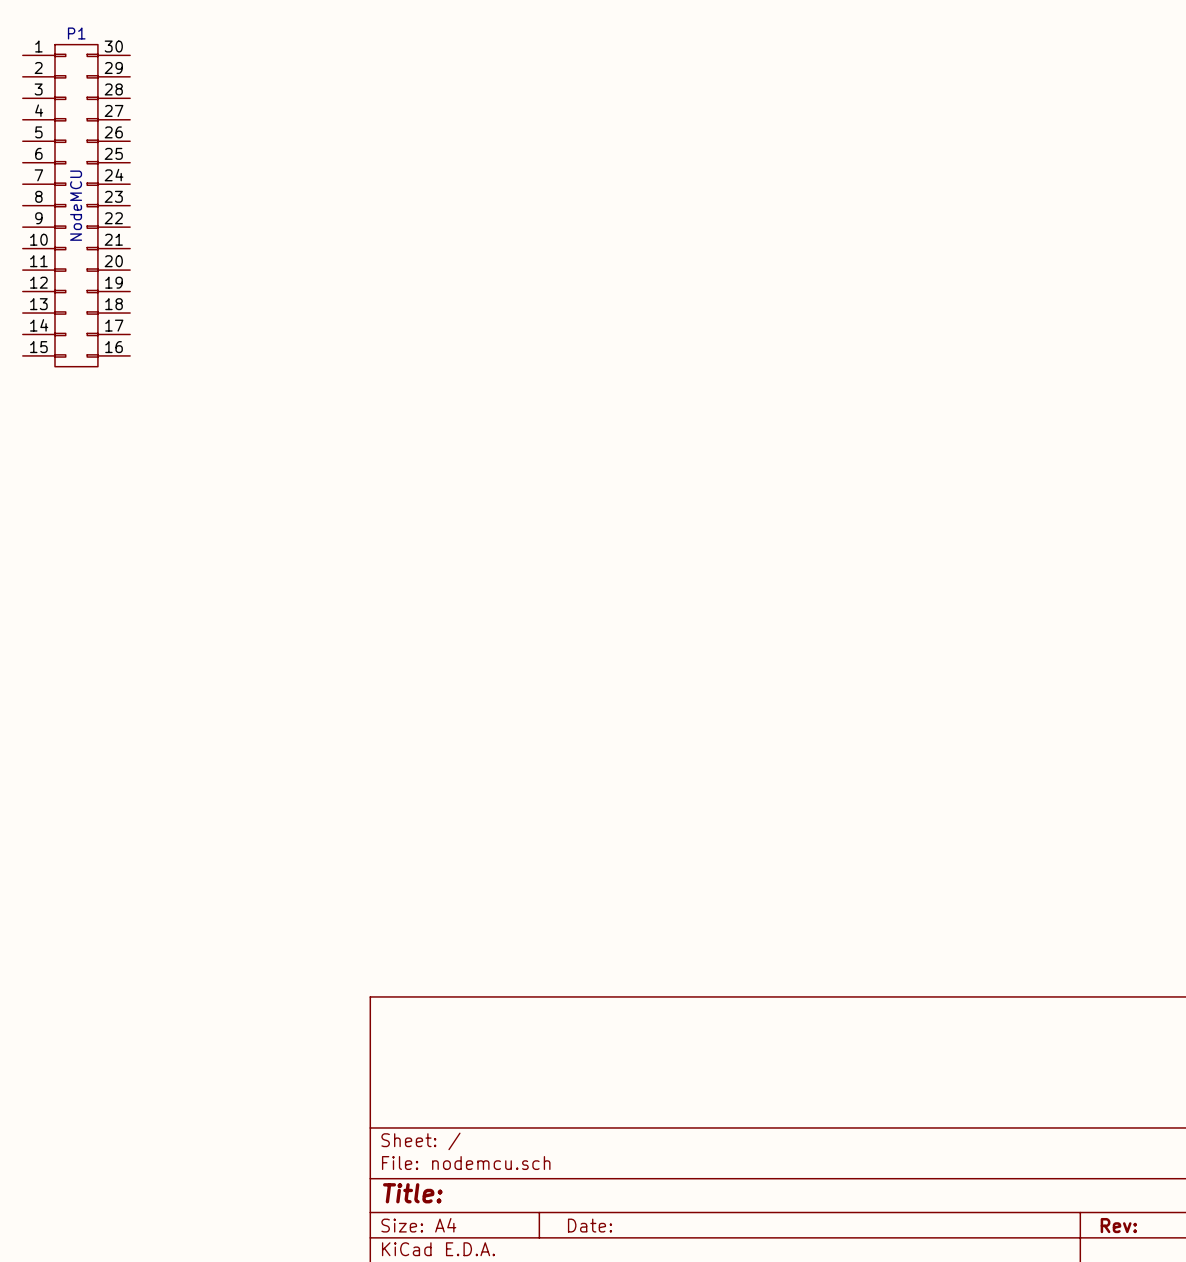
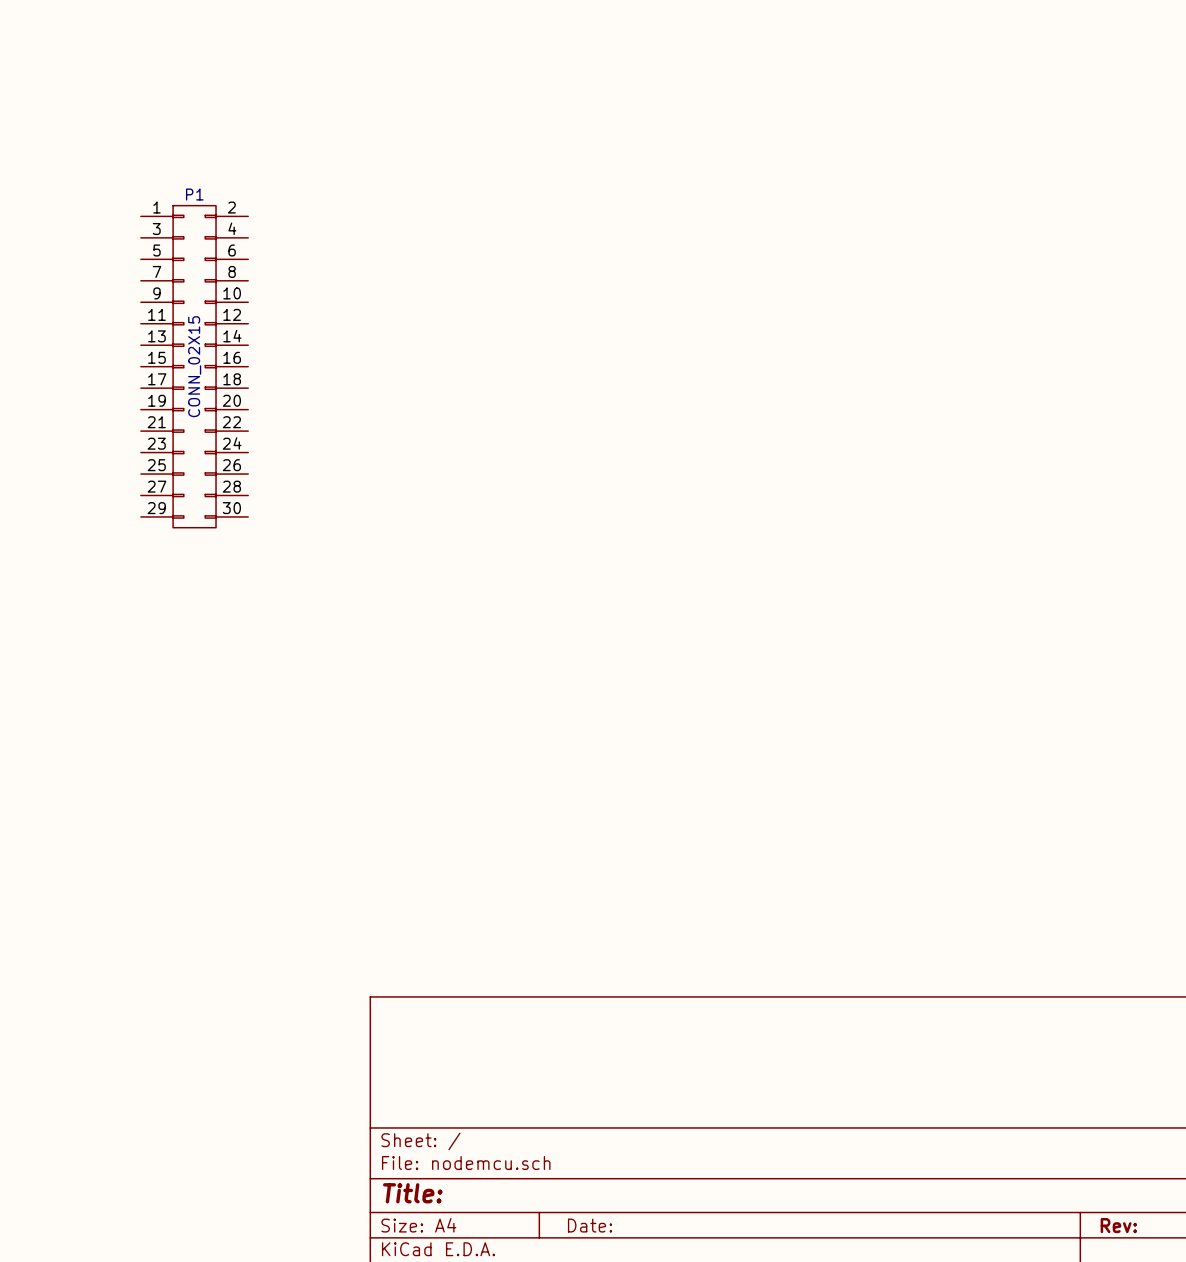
P1 symbol: [22, 44, 131, 367] -> [140, 205, 249, 528]
P1 value: NodeMCU (76, 205) -> CONN_02X15 (194, 366)

